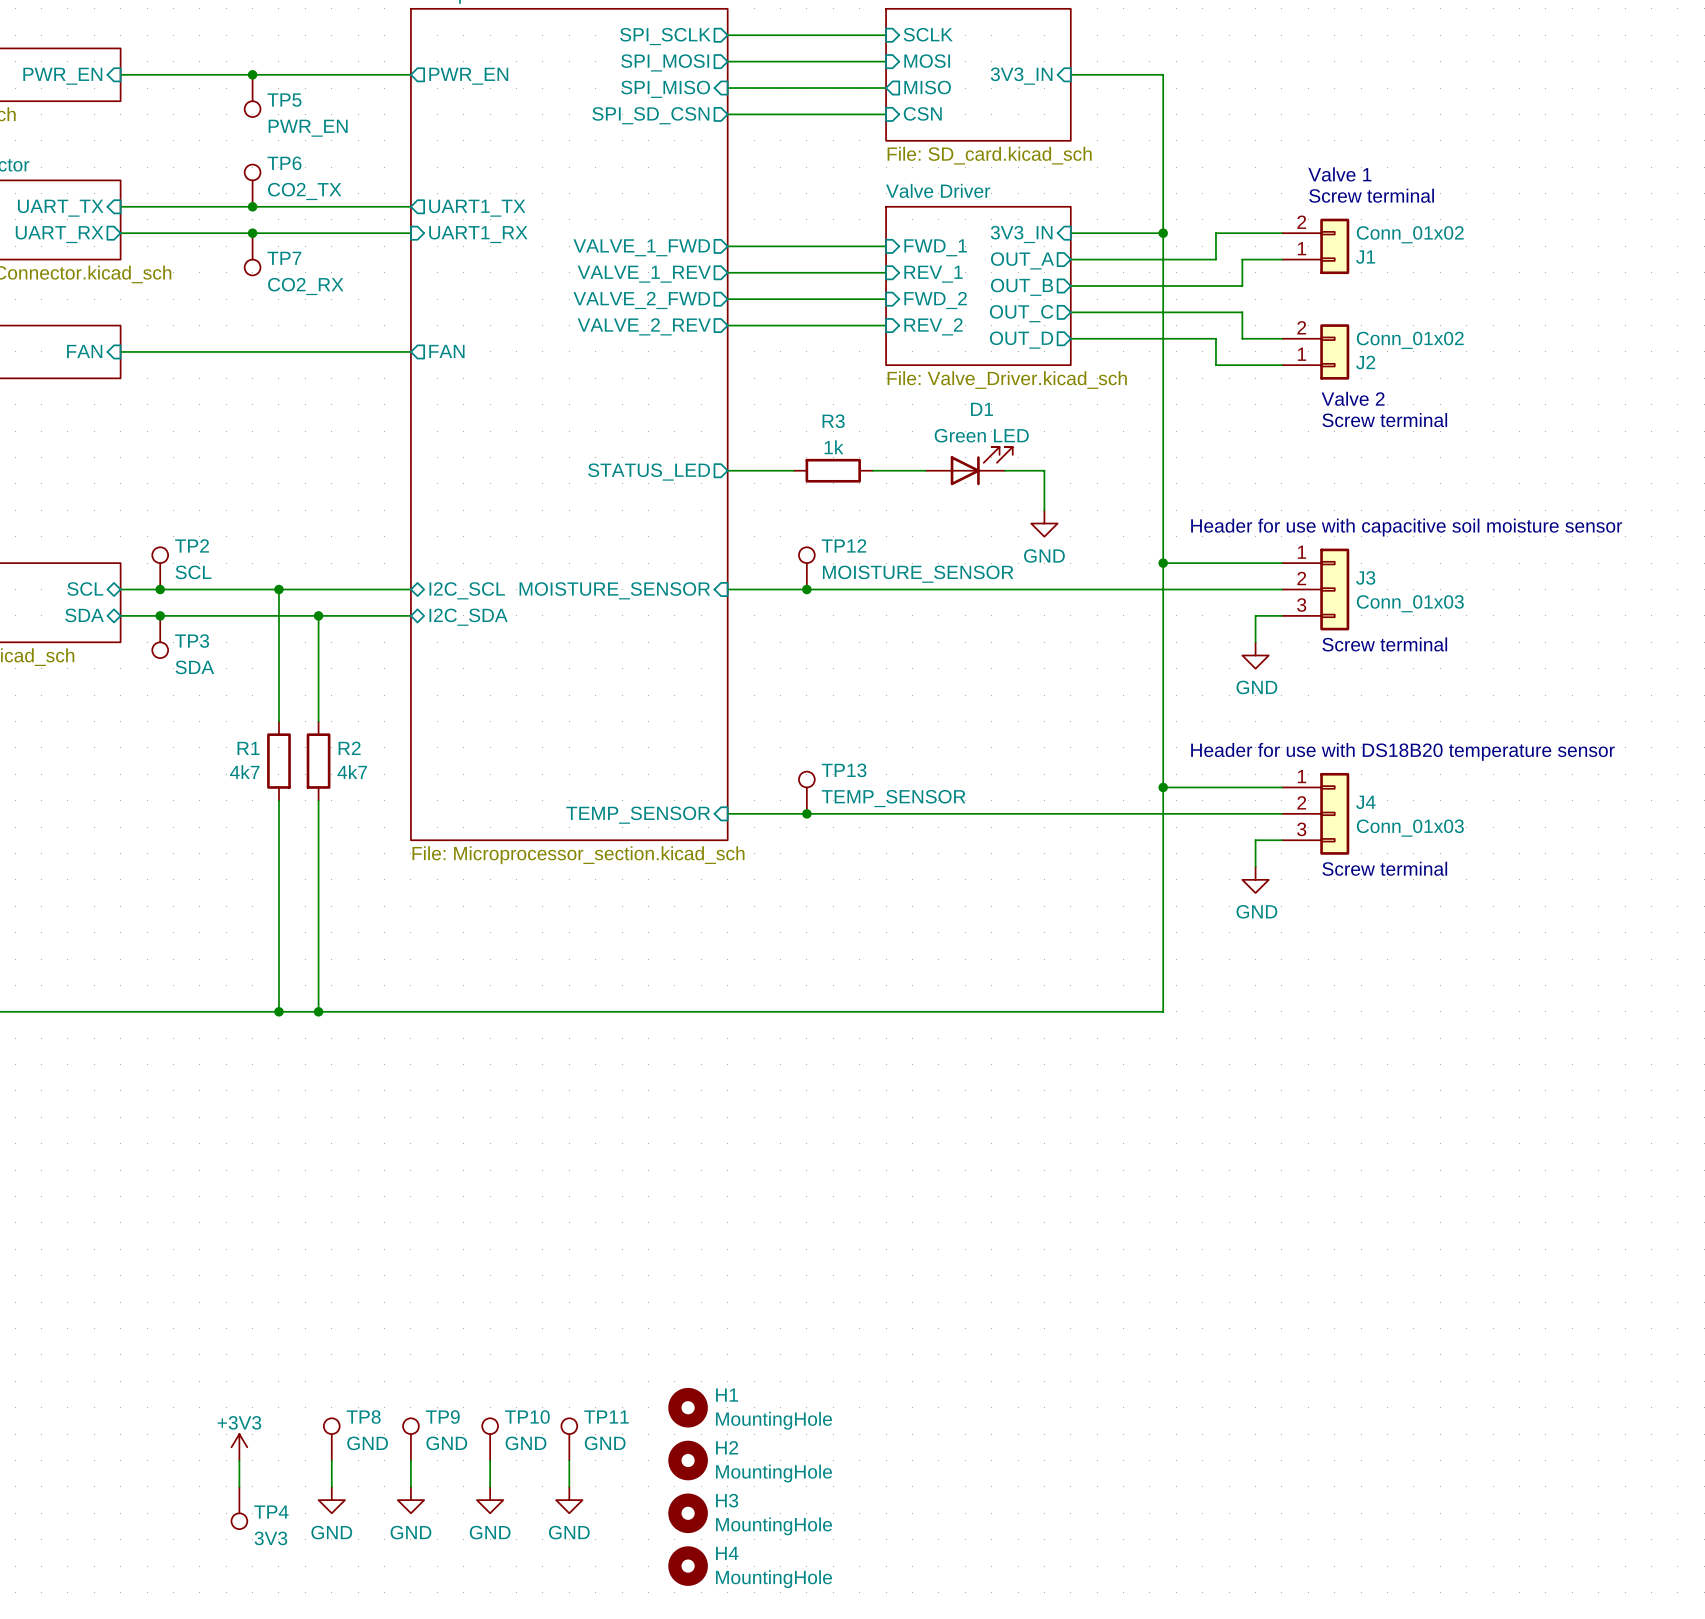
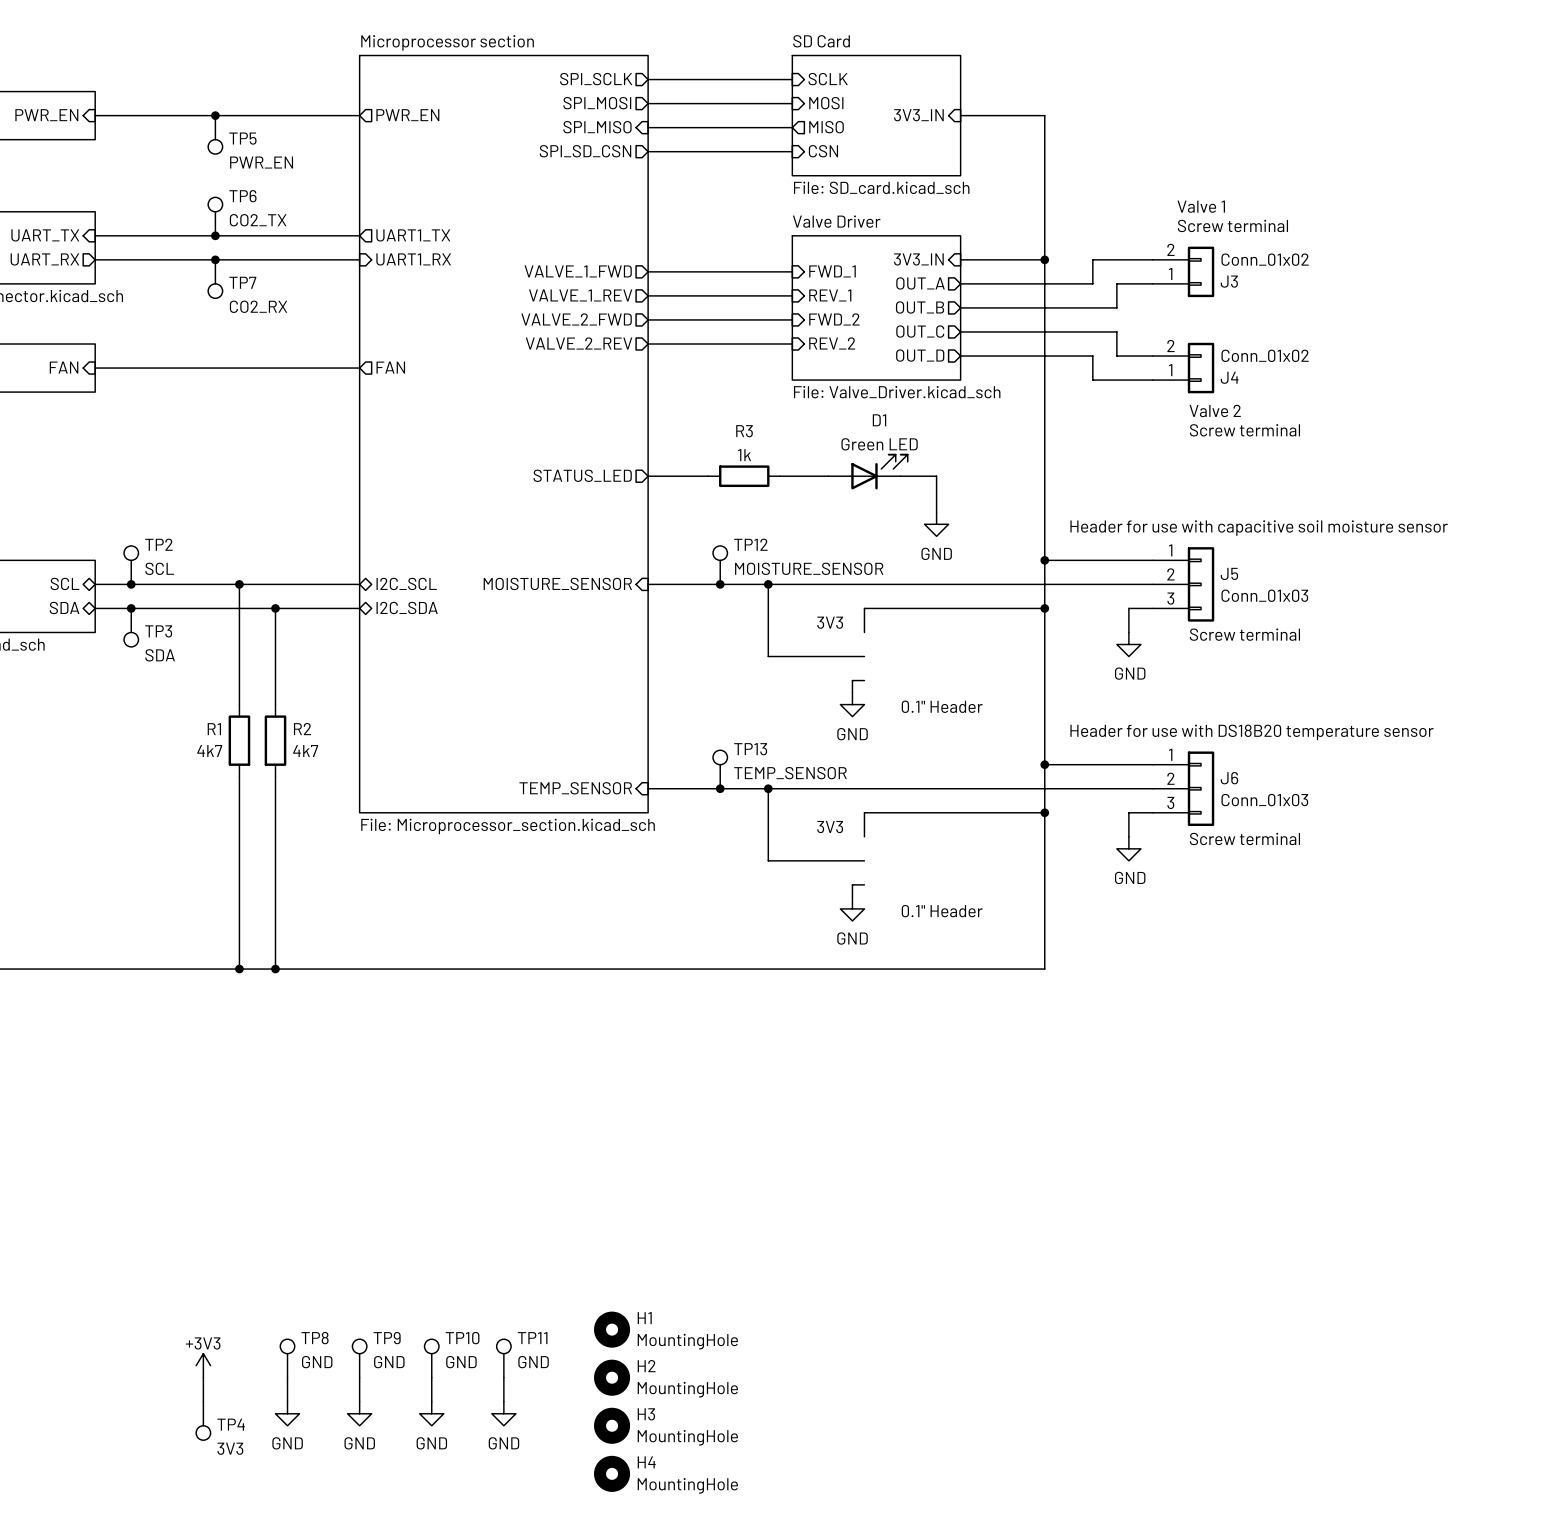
J1 name: J1 (1365, 257) -> J3 (1229, 281)
J2 name: J2 (1365, 362) -> J4 (1229, 377)
J3 name: J3 (1365, 577) -> J5 (1229, 573)
wire: none -> (768, 584) (768, 656) (864, 656)
junction: none -> (768, 584)
wire: none -> (1044, 608) (864, 608) (864, 632)
junction: none -> (1044, 608)
text: none -> 3V3 (830, 622)
wire: none -> (864, 680) (852, 680) (852, 692)
power symbol: none -> GND (852, 704)
text: none -> 0.1" Header (942, 706)
J4 name: J4 (1365, 802) -> J6 (1229, 778)
wire: none -> (768, 788) (768, 860) (864, 860)
junction: none -> (768, 788)
wire: none -> (1044, 812) (864, 812) (864, 836)
junction: none -> (1044, 812)
text: none -> 3V3 (830, 827)
wire: none -> (864, 884) (852, 884) (852, 896)
power symbol: none -> GND (852, 908)
text: none -> 0.1" Header (942, 911)

